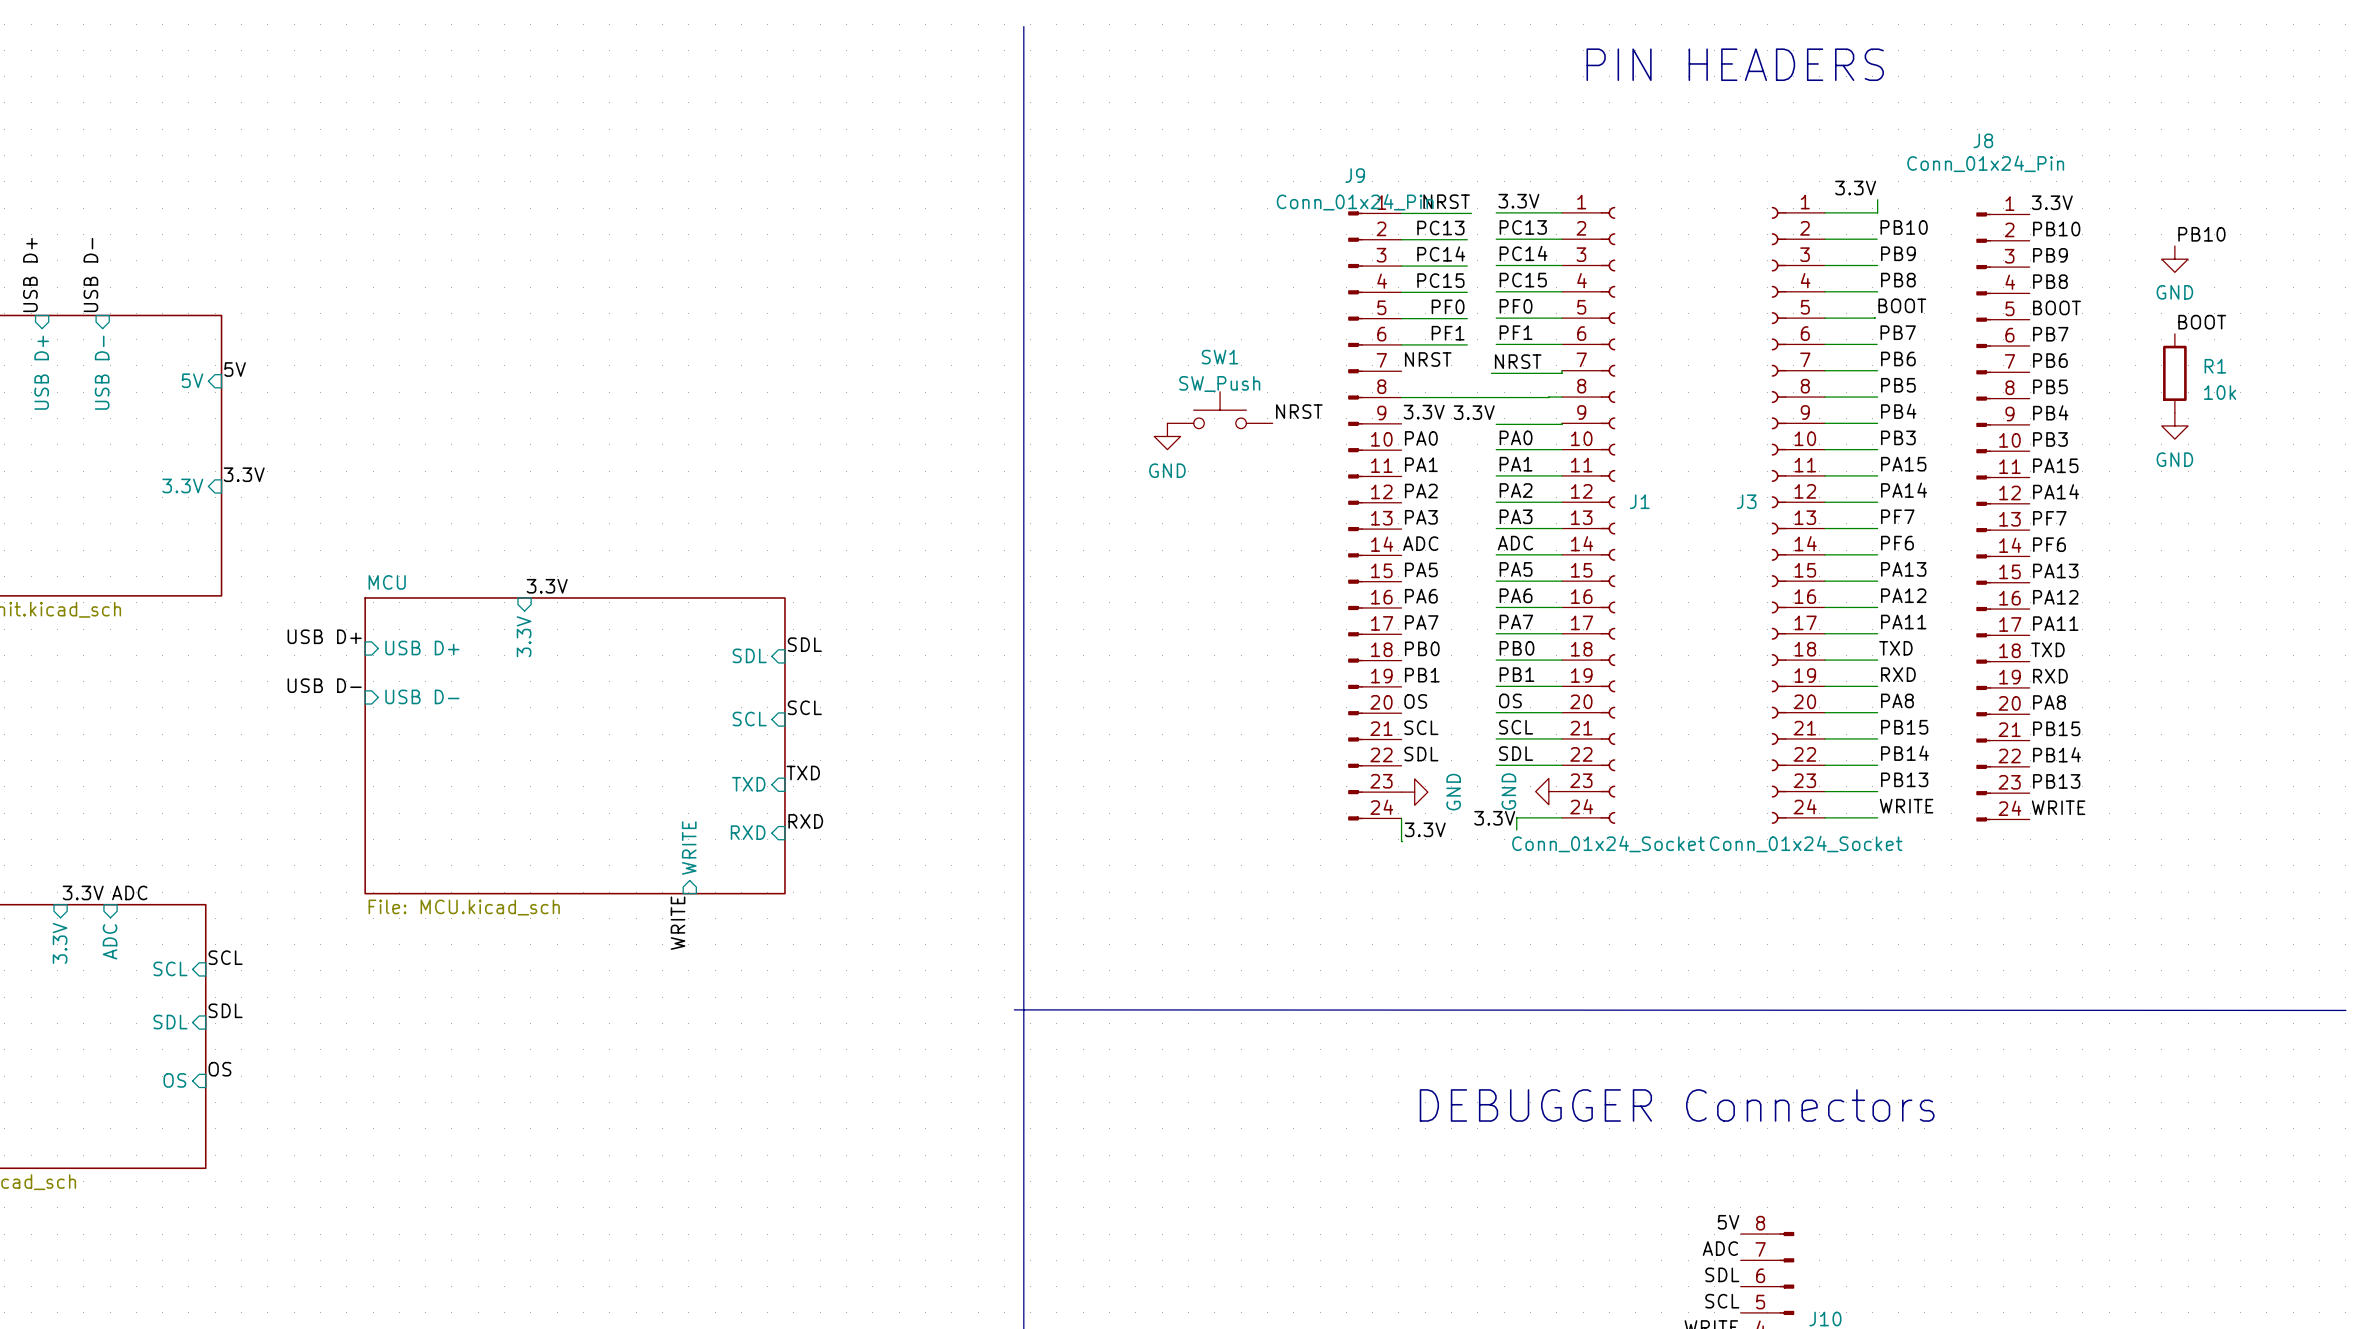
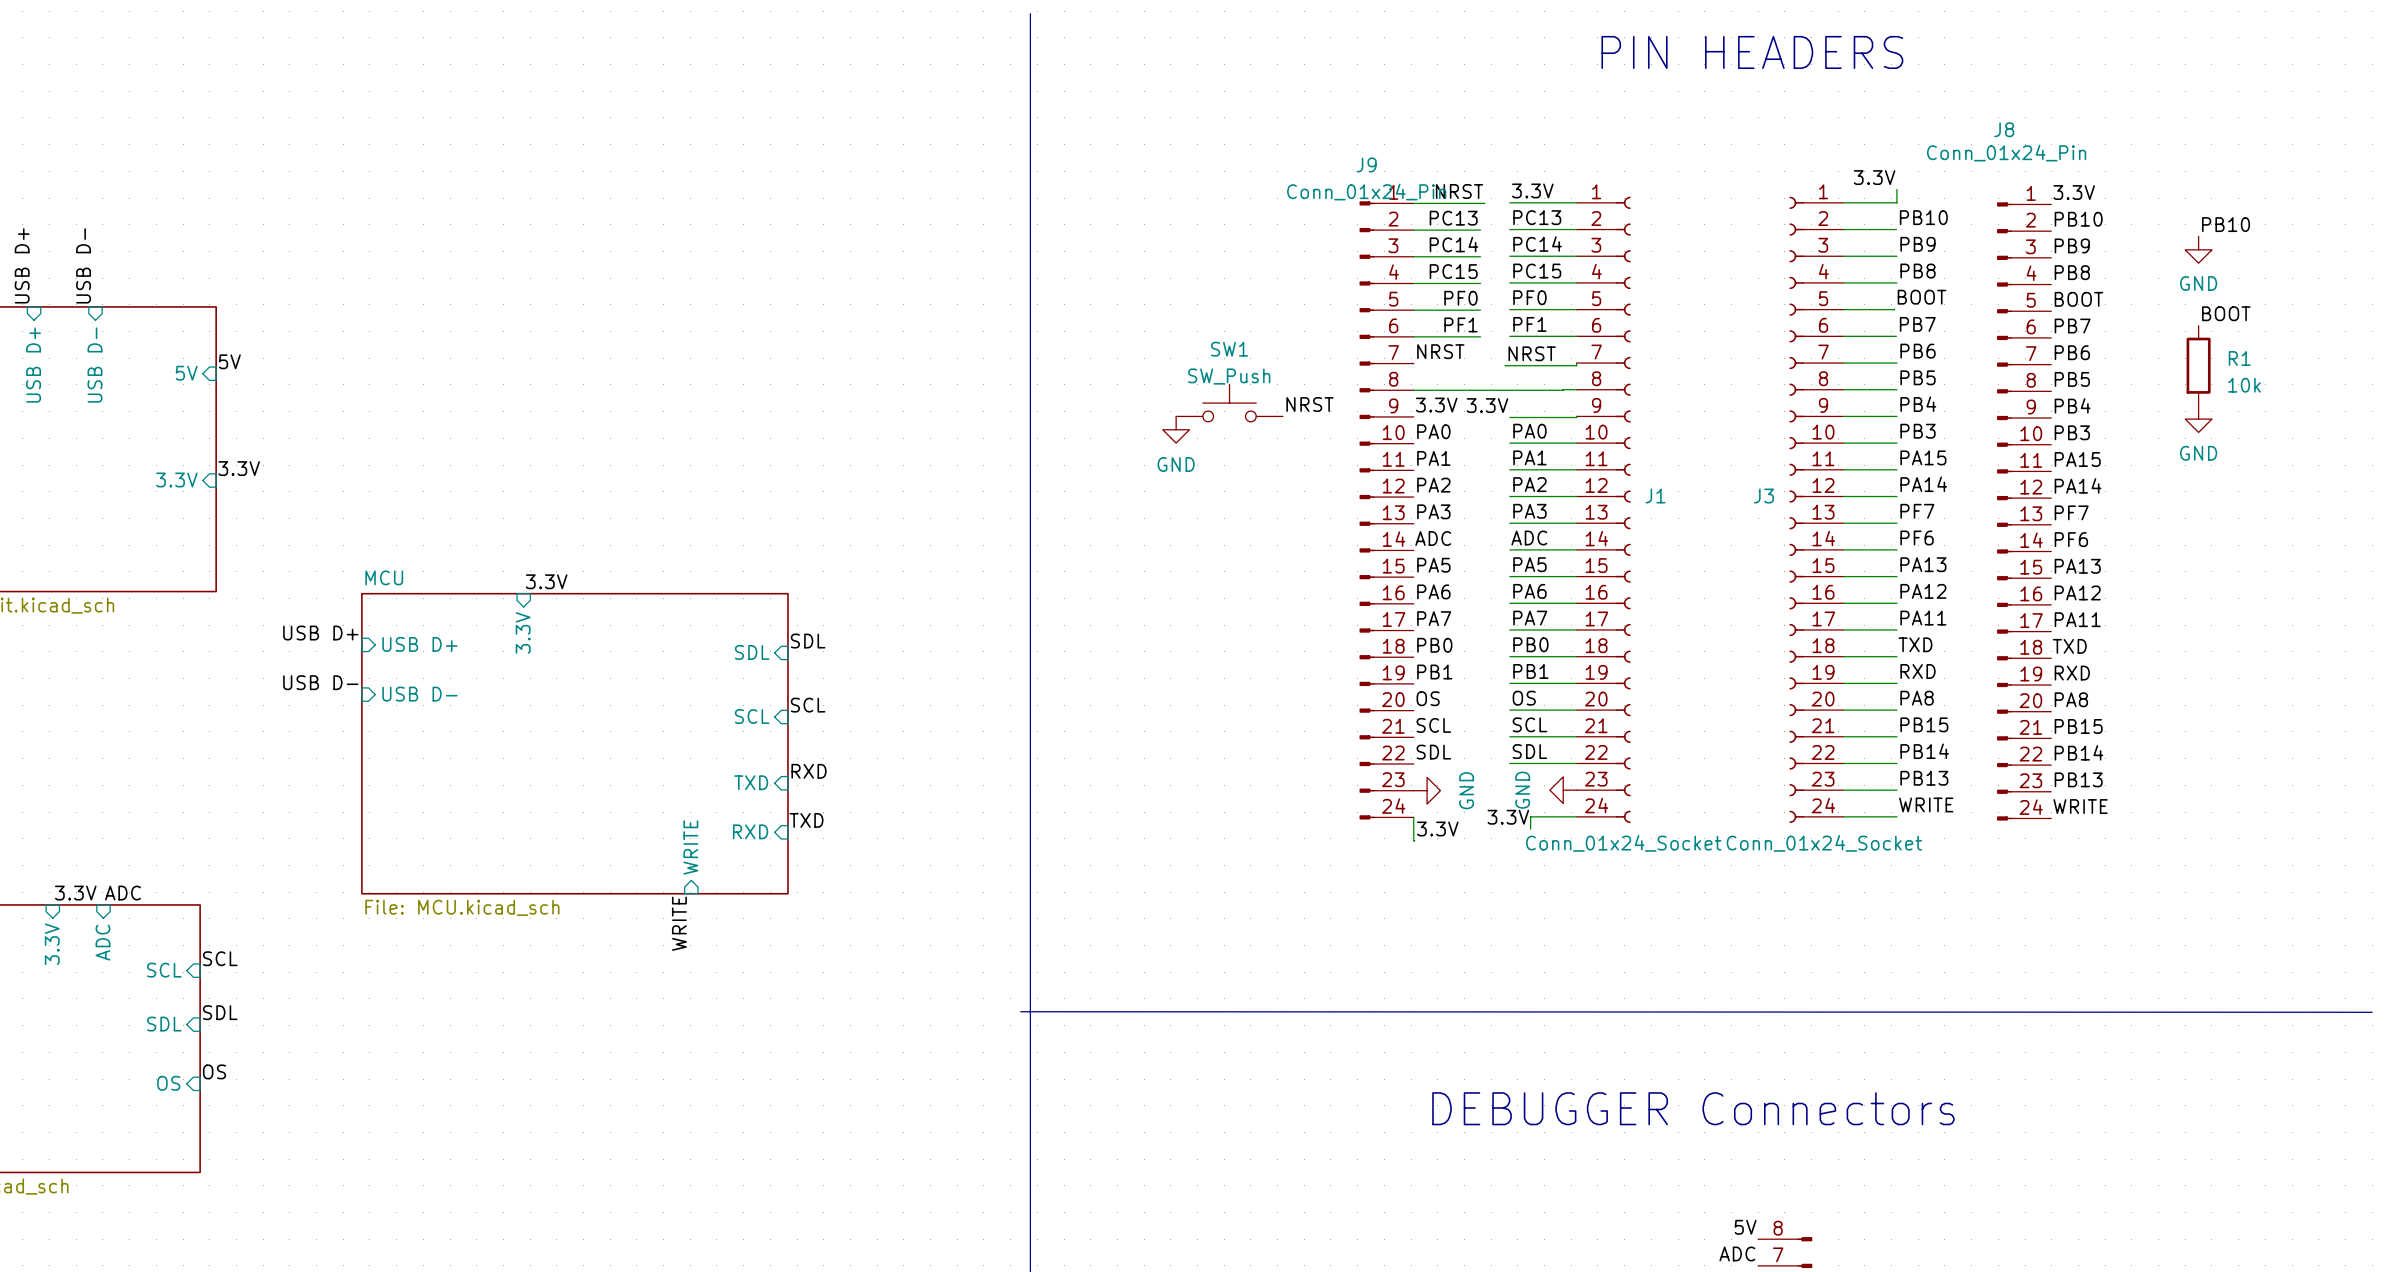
label: TXD (803, 773) -> RXD (809, 771)
label: RXD (805, 821) -> TXD (806, 820)

